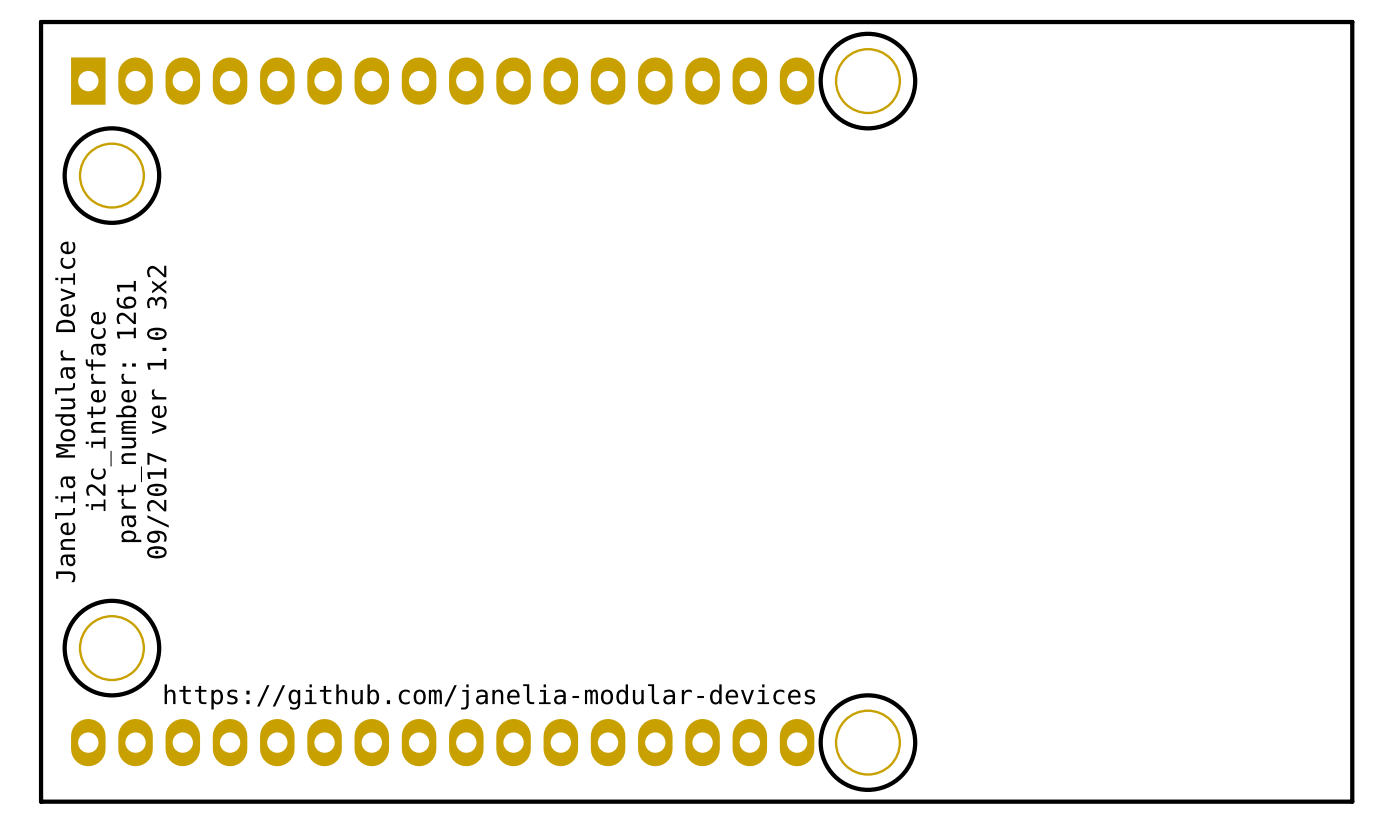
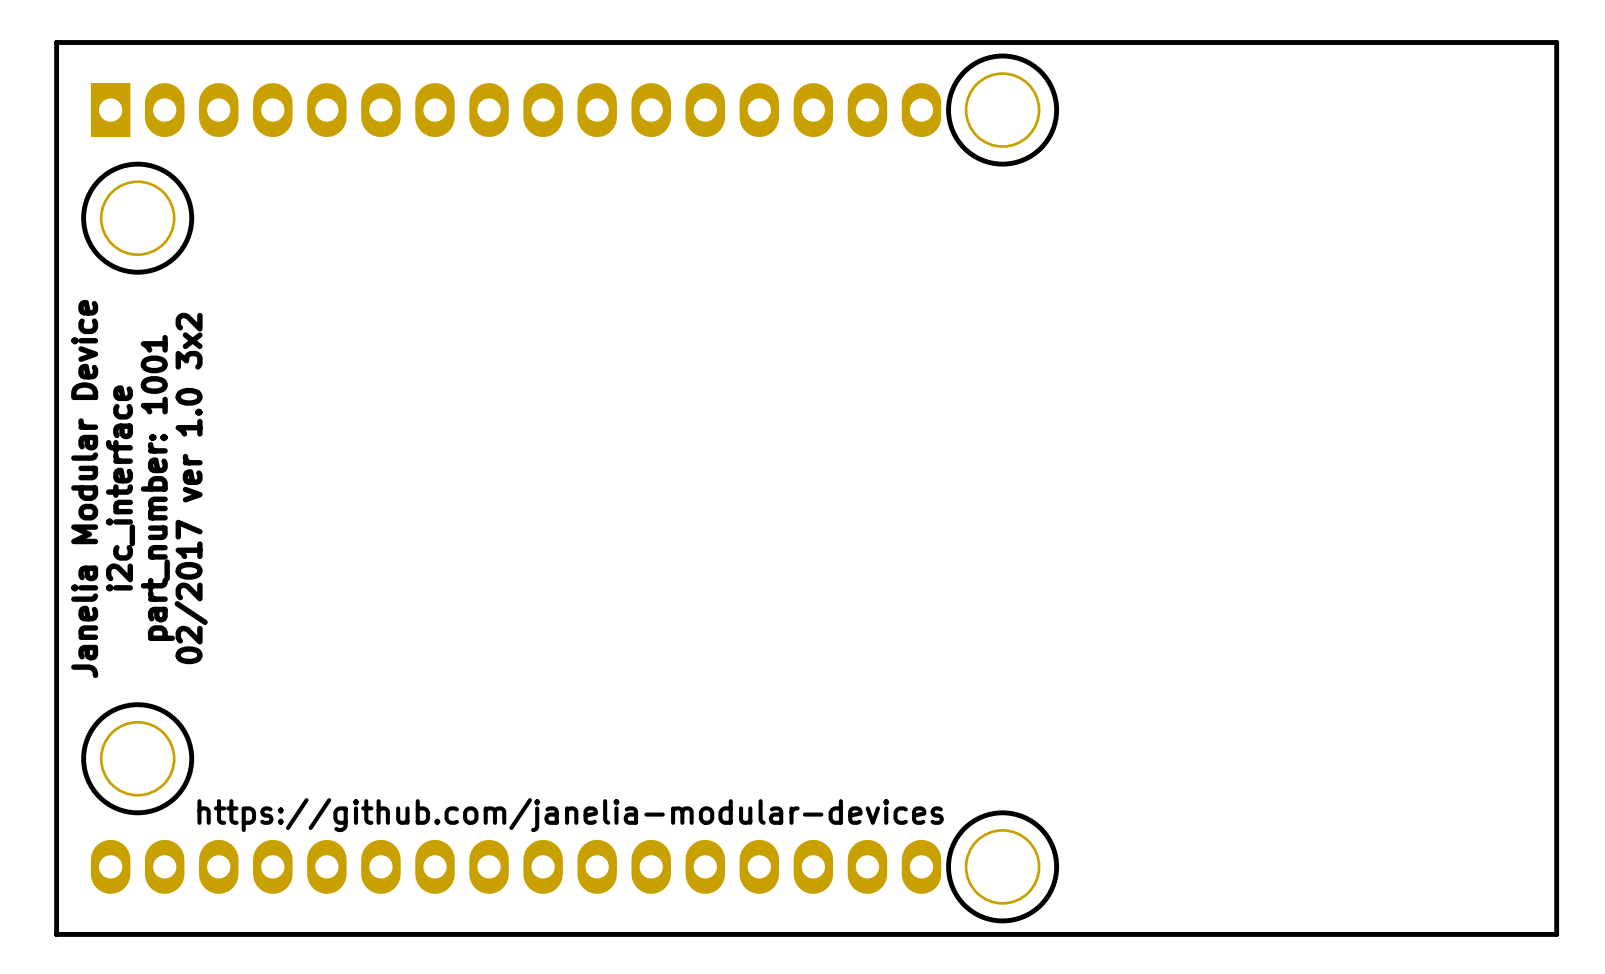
text: part_number: 1261 (129, 411) -> part_number: 1001 (157, 487)
text: 09/2017 ver 1.0 3x2 (157, 412) -> 02/2017 ver 1.0 3x2 (191, 488)

